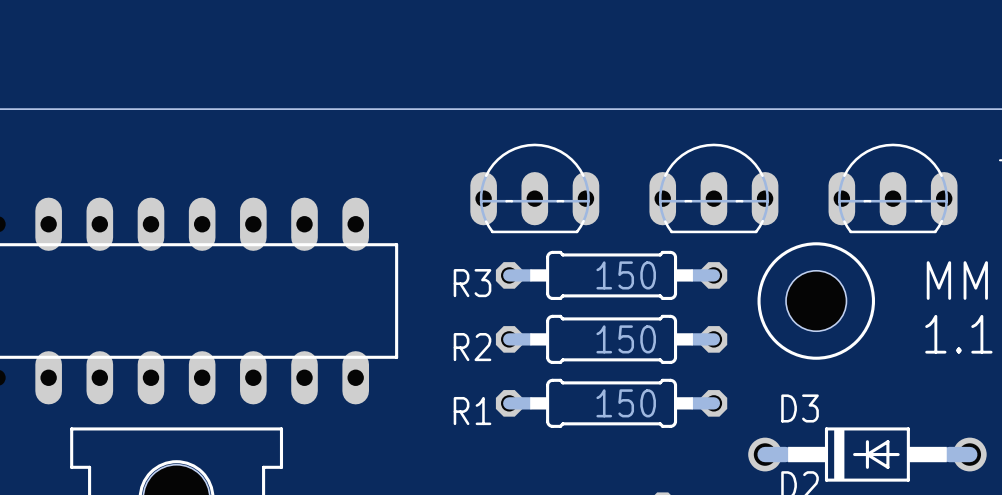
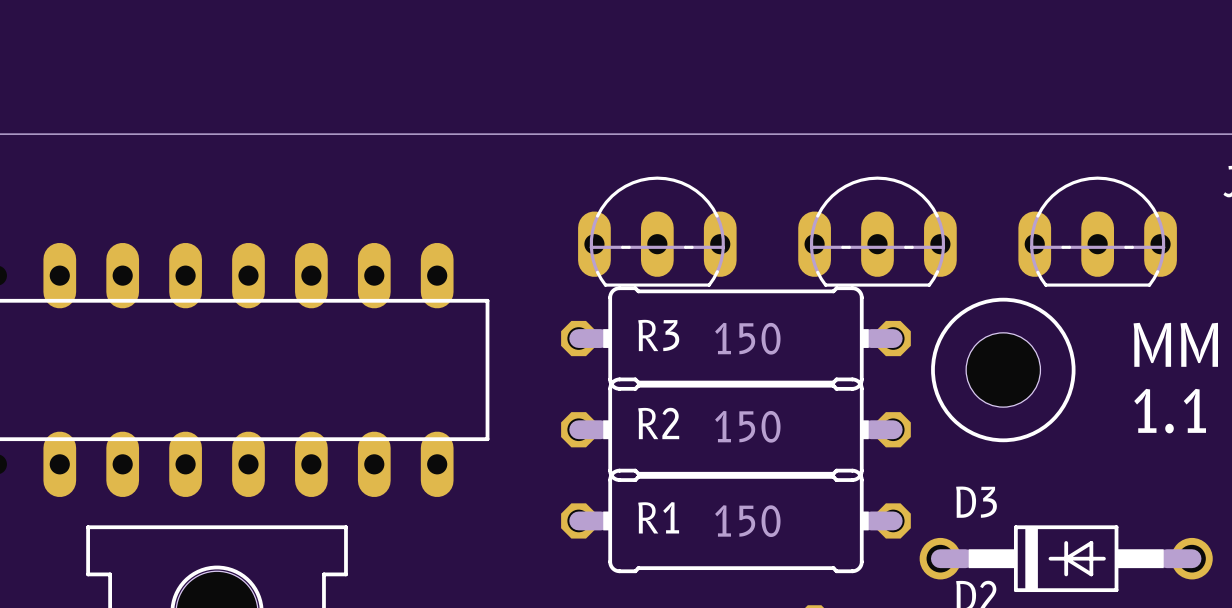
R3 footprint: [495, 250, 728, 300] -> [561, 286, 911, 391]
R3 name position: R3 (472, 283) -> R3 (658, 335)
R2 footprint: [495, 314, 728, 364] -> [561, 377, 911, 482]
R2 name position: R2 (472, 347) -> R2 (658, 423)
R1 footprint: [495, 378, 728, 428] -> [561, 468, 911, 574]
R1 name position: R1 (472, 411) -> R1 (658, 517)

